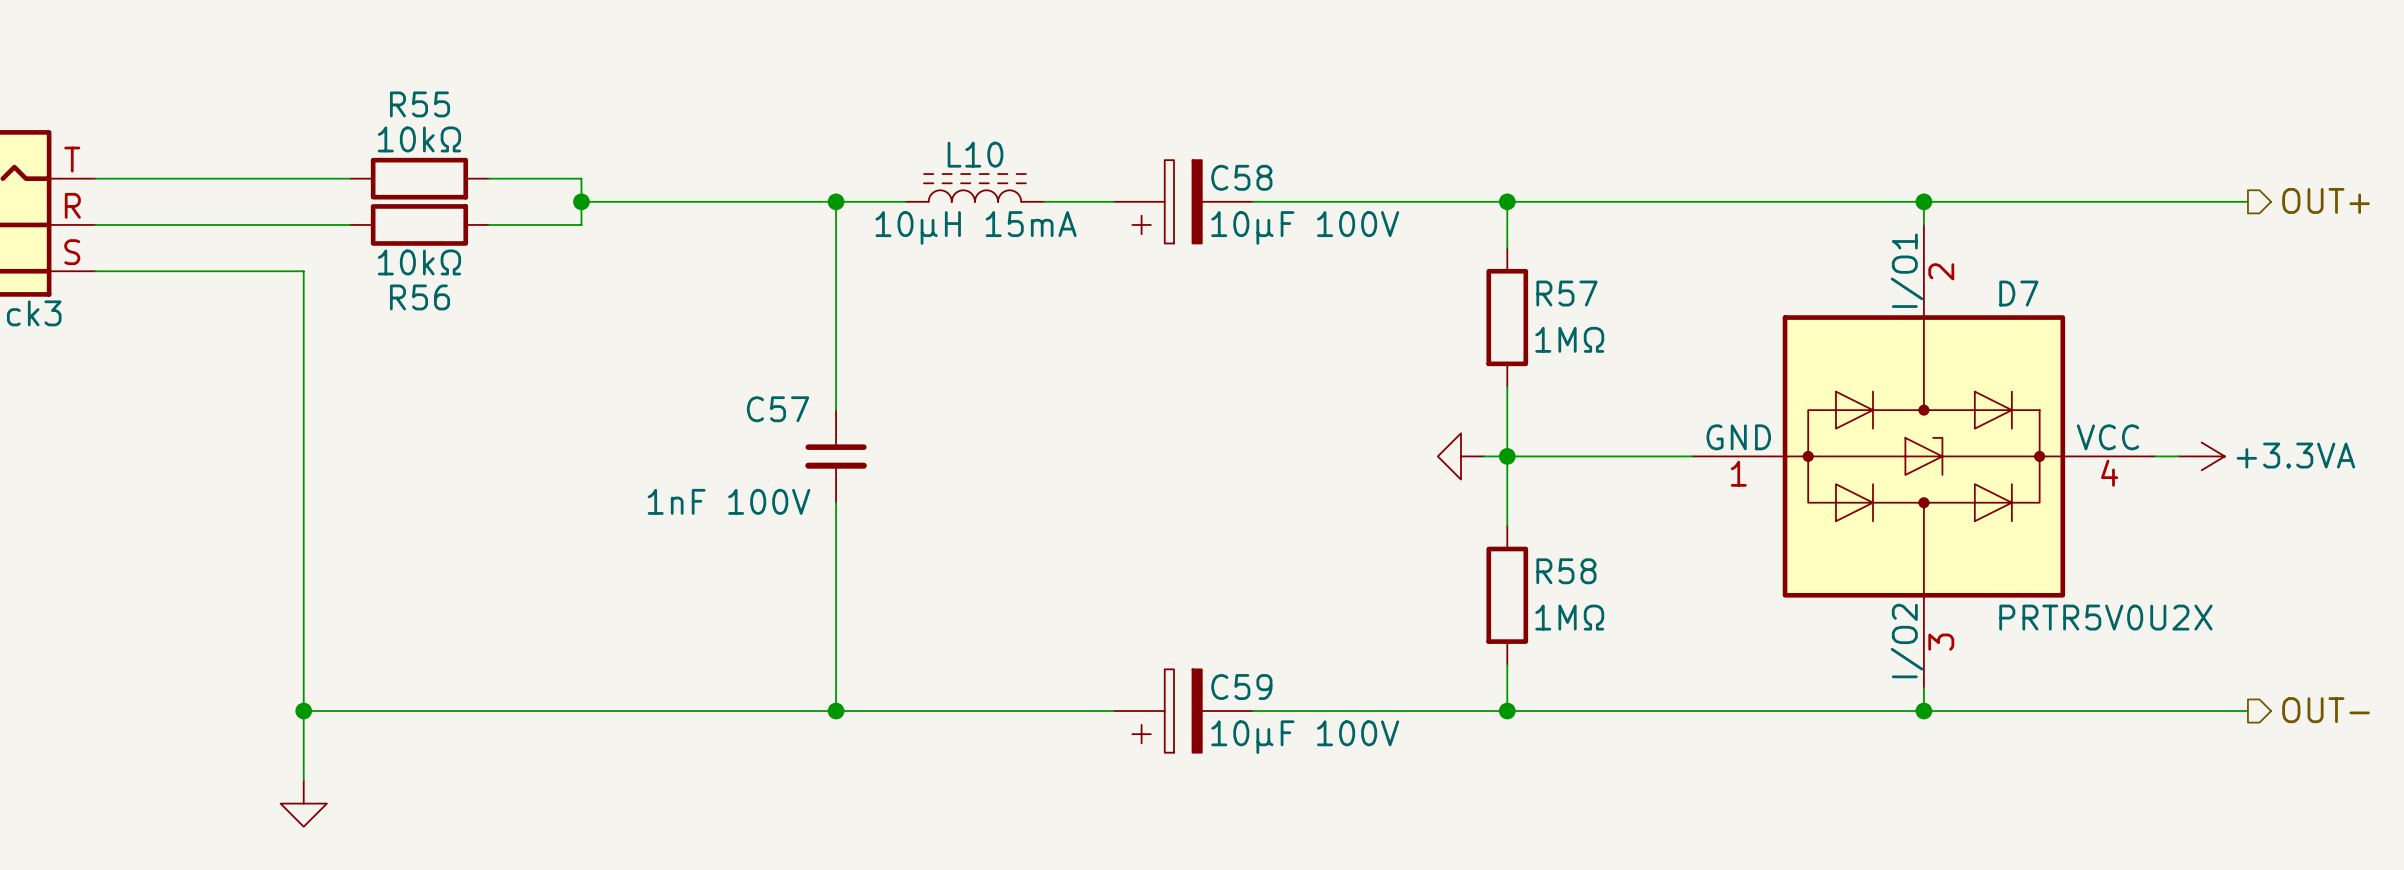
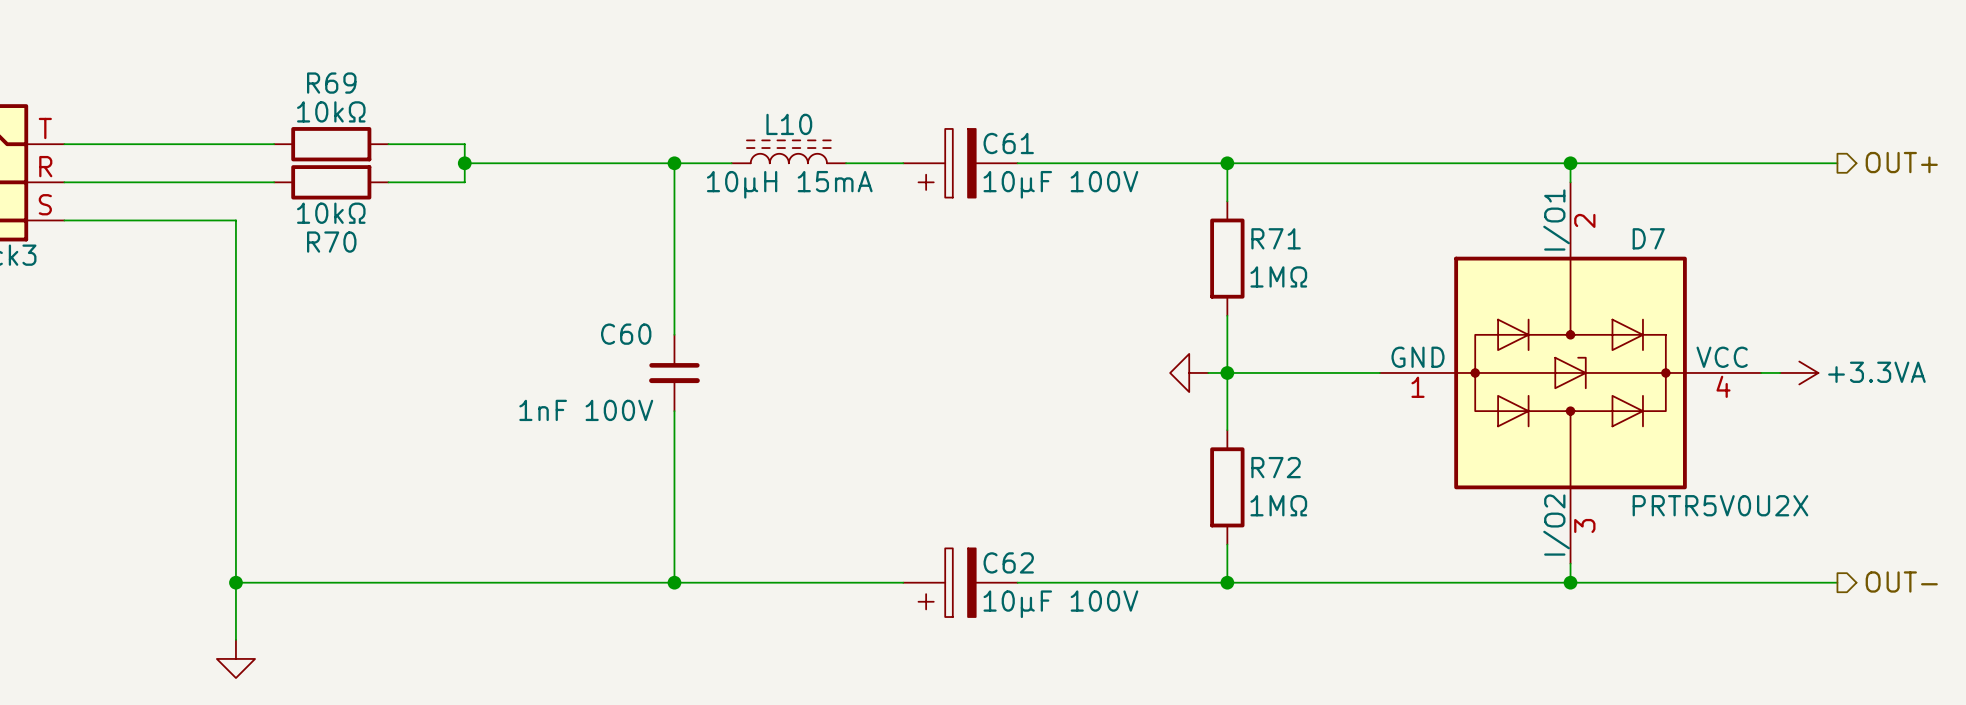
R55 name: R55 (420, 104) -> R69 (331, 83)
C58 name: C58 (1241, 177) -> C61 (1008, 143)
R57 name: R57 (1566, 293) -> R71 (1276, 238)
R56 name: R56 (420, 297) -> R70 (331, 242)
C57 name: C57 (778, 409) -> C60 (626, 334)
R58 name: R58 (1566, 571) -> R72 (1276, 467)
C59 name: C59 (1241, 687) -> C62 (1008, 562)

